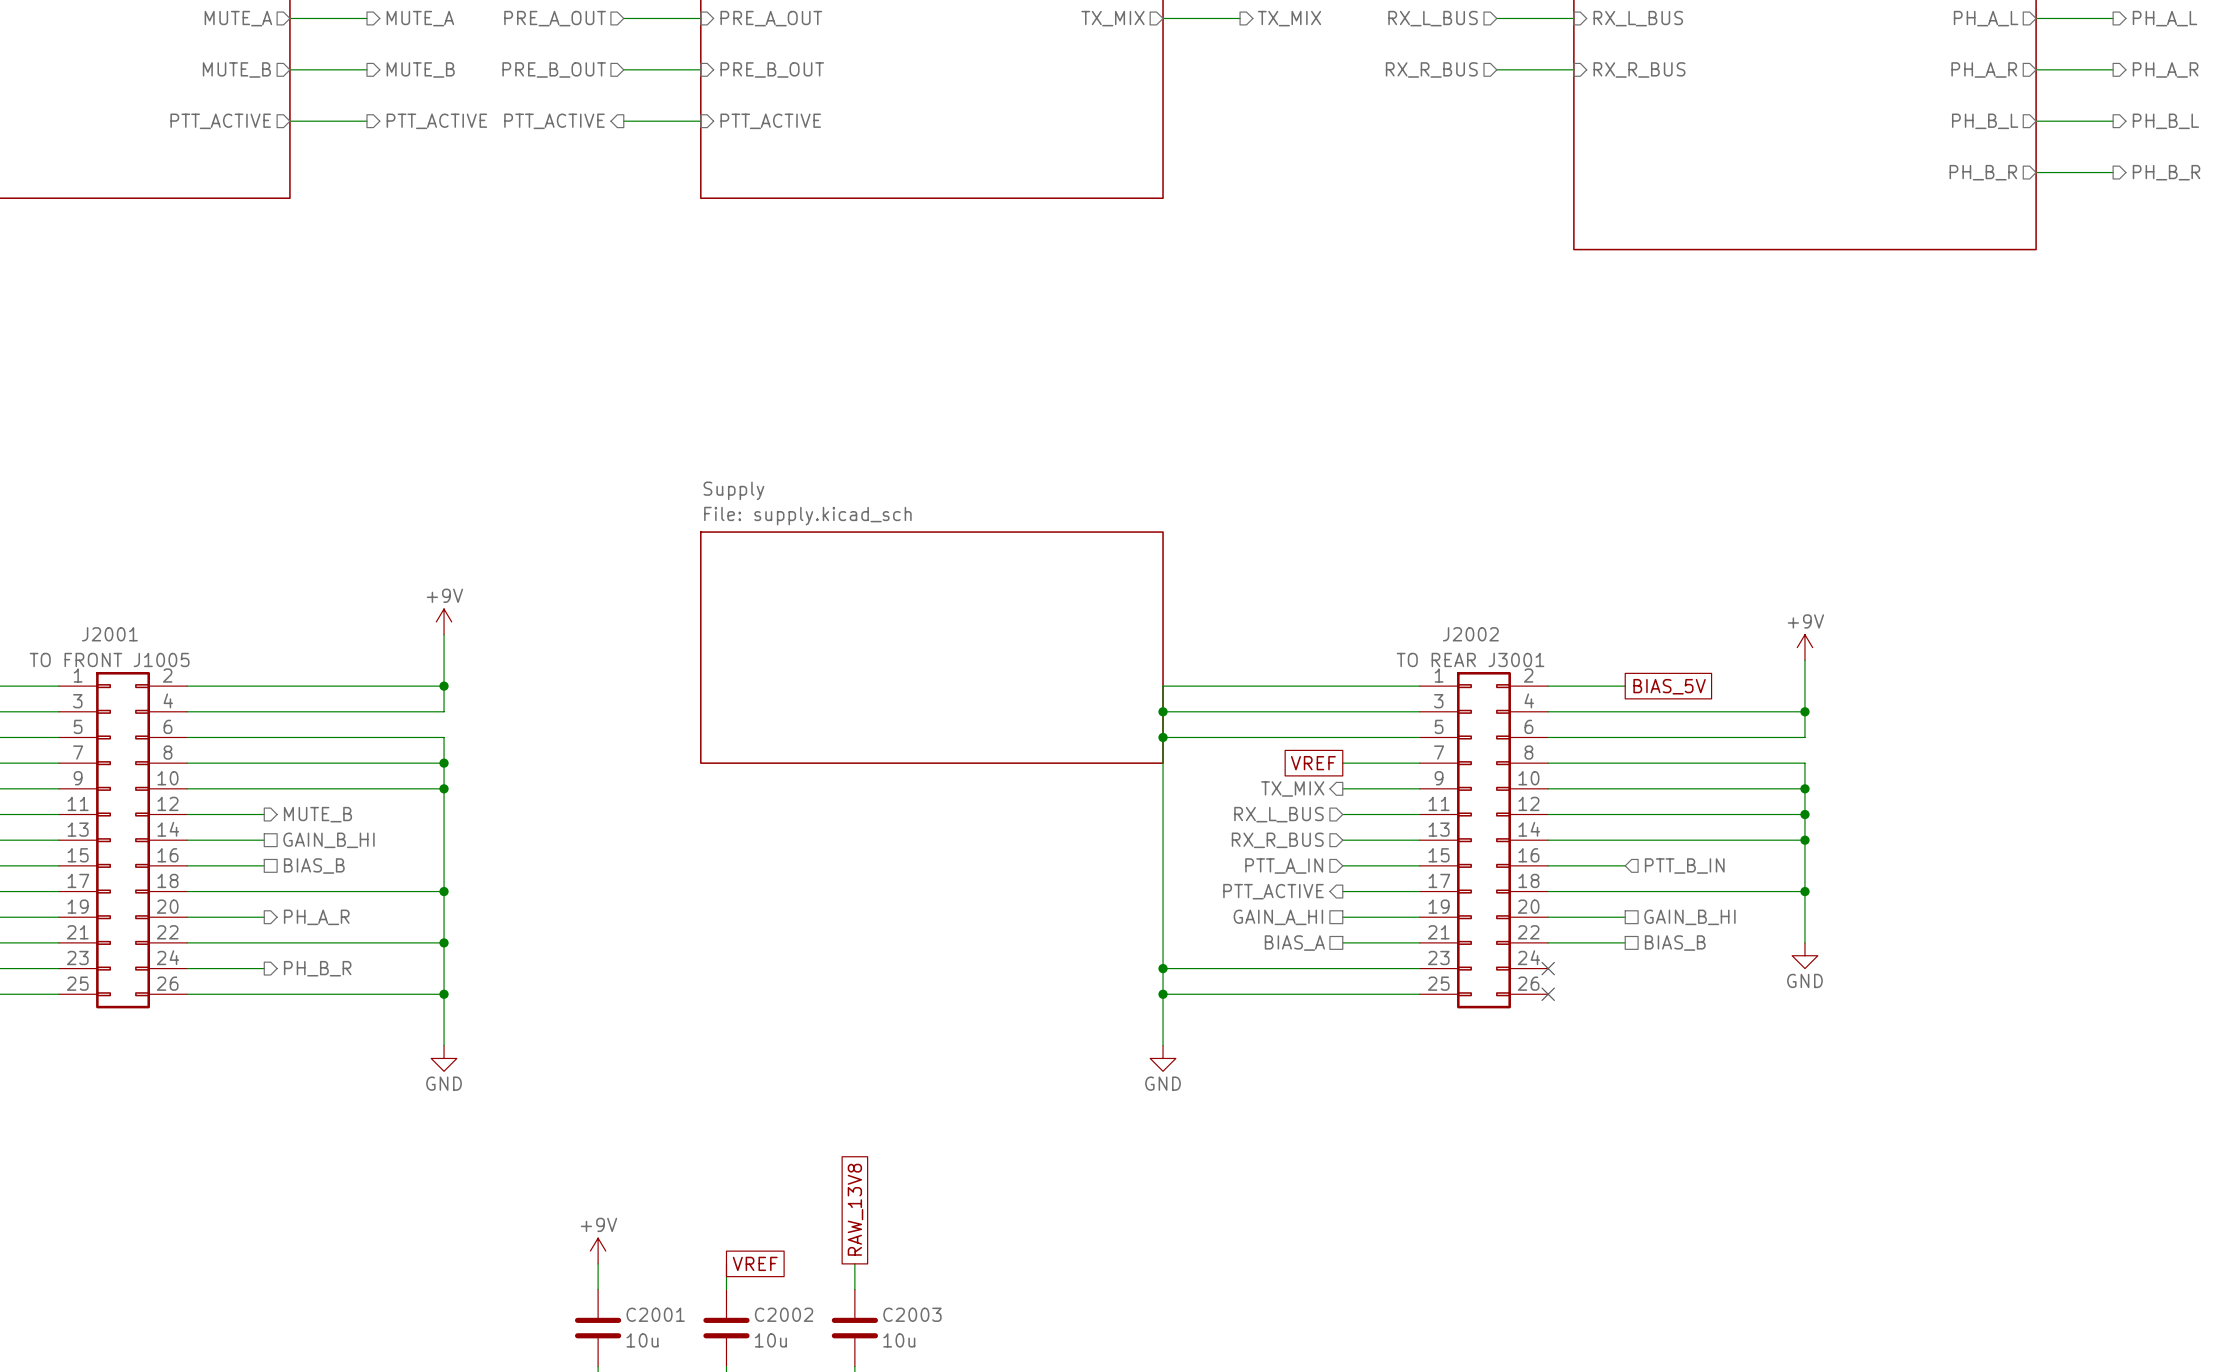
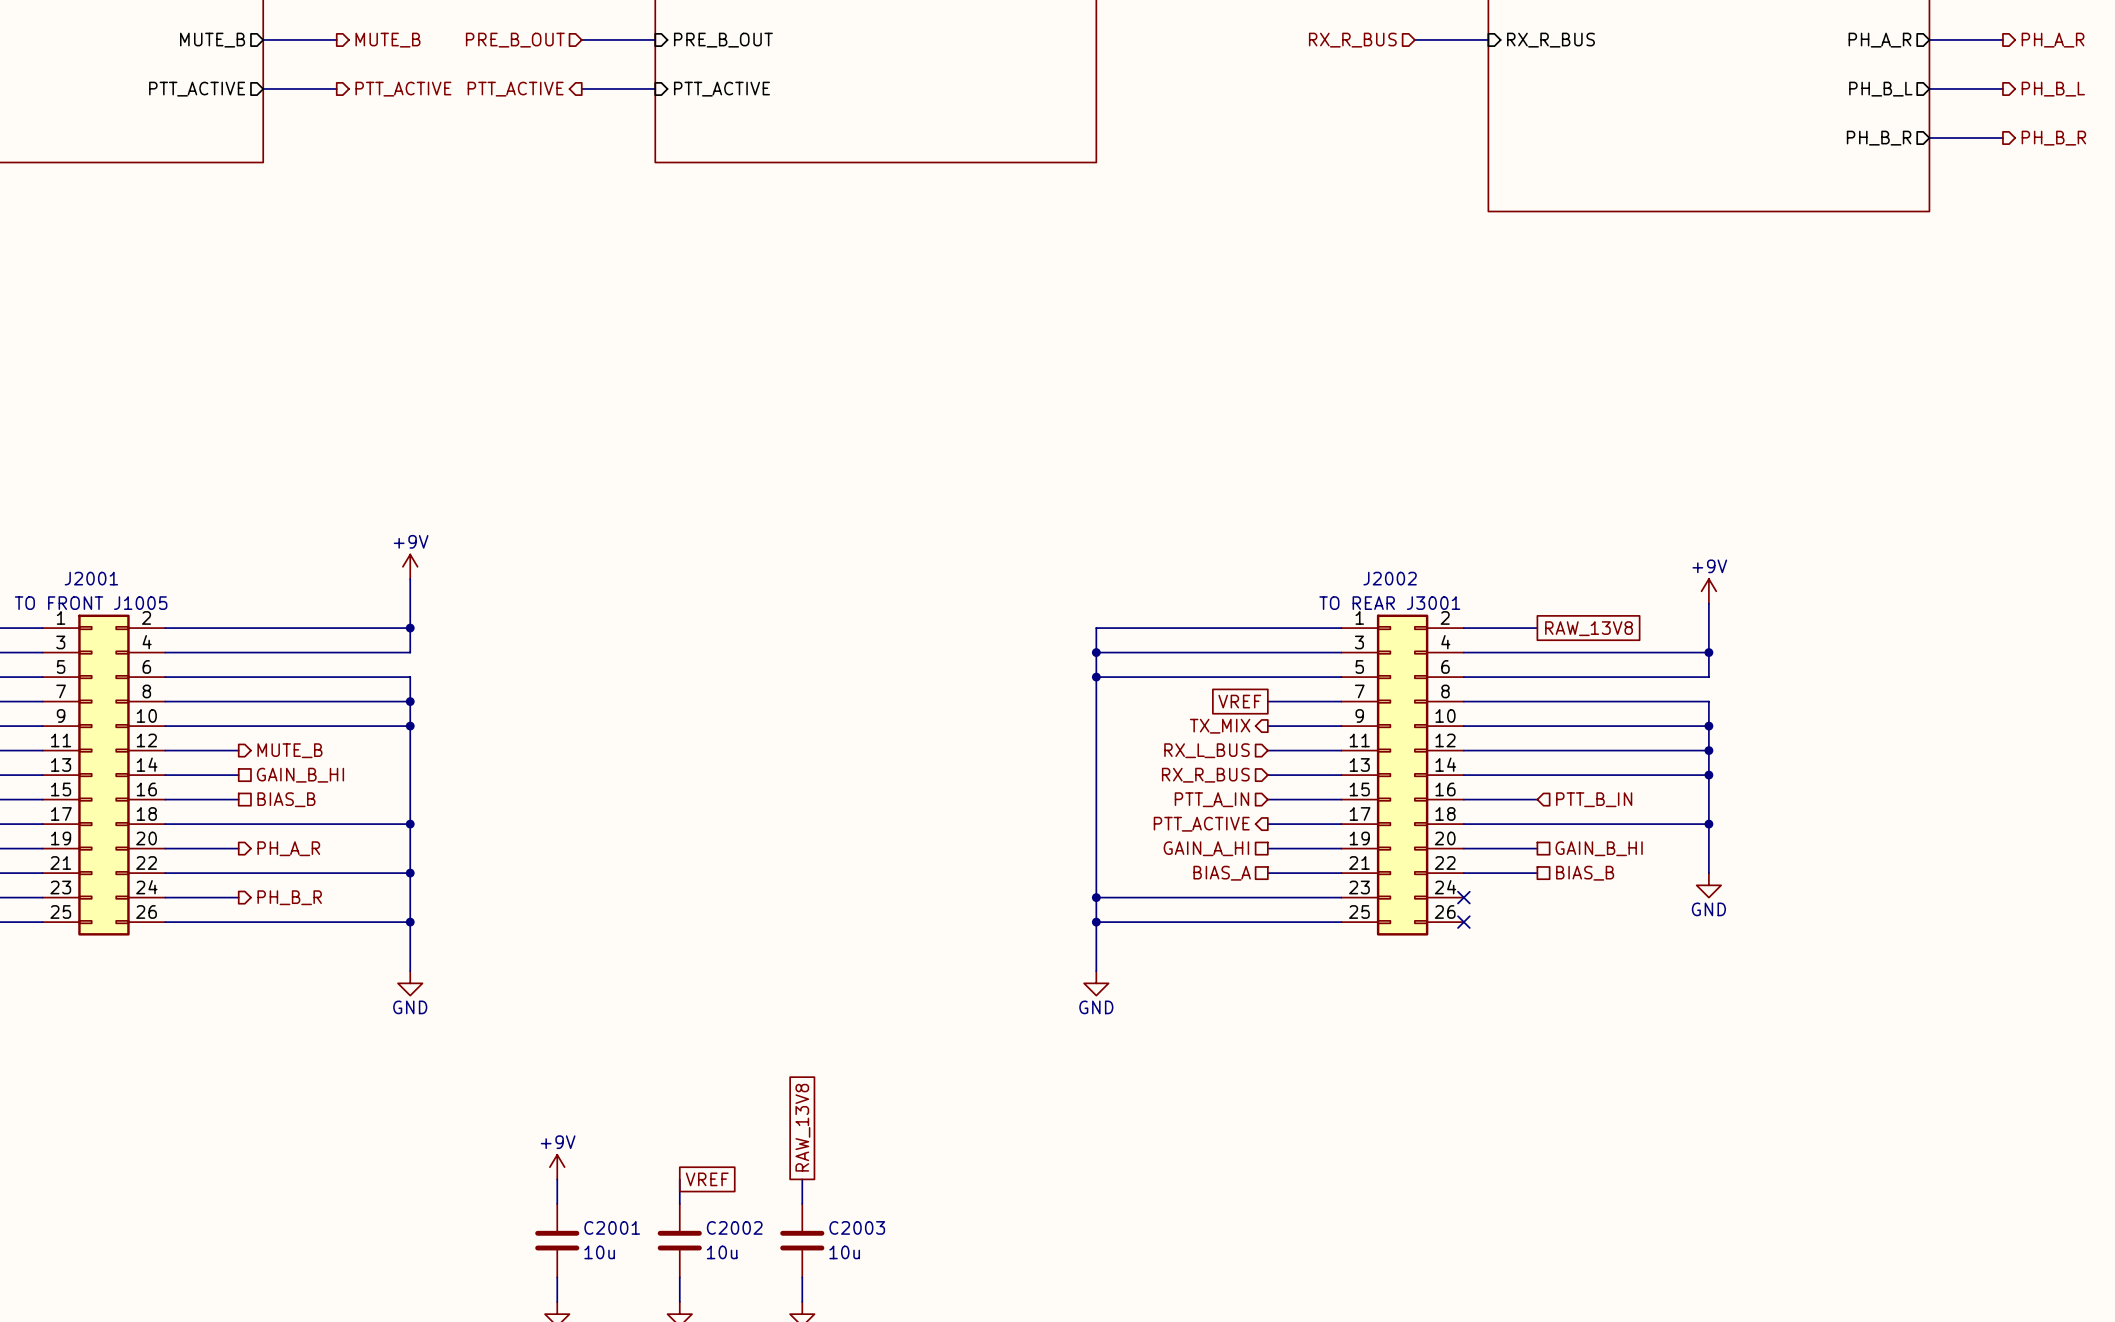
sheet Supply: File: supply.kicad_sch (931, 647) -> none
global label: BIAS_5V (1669, 686) -> RAW_13V8 (1589, 628)

